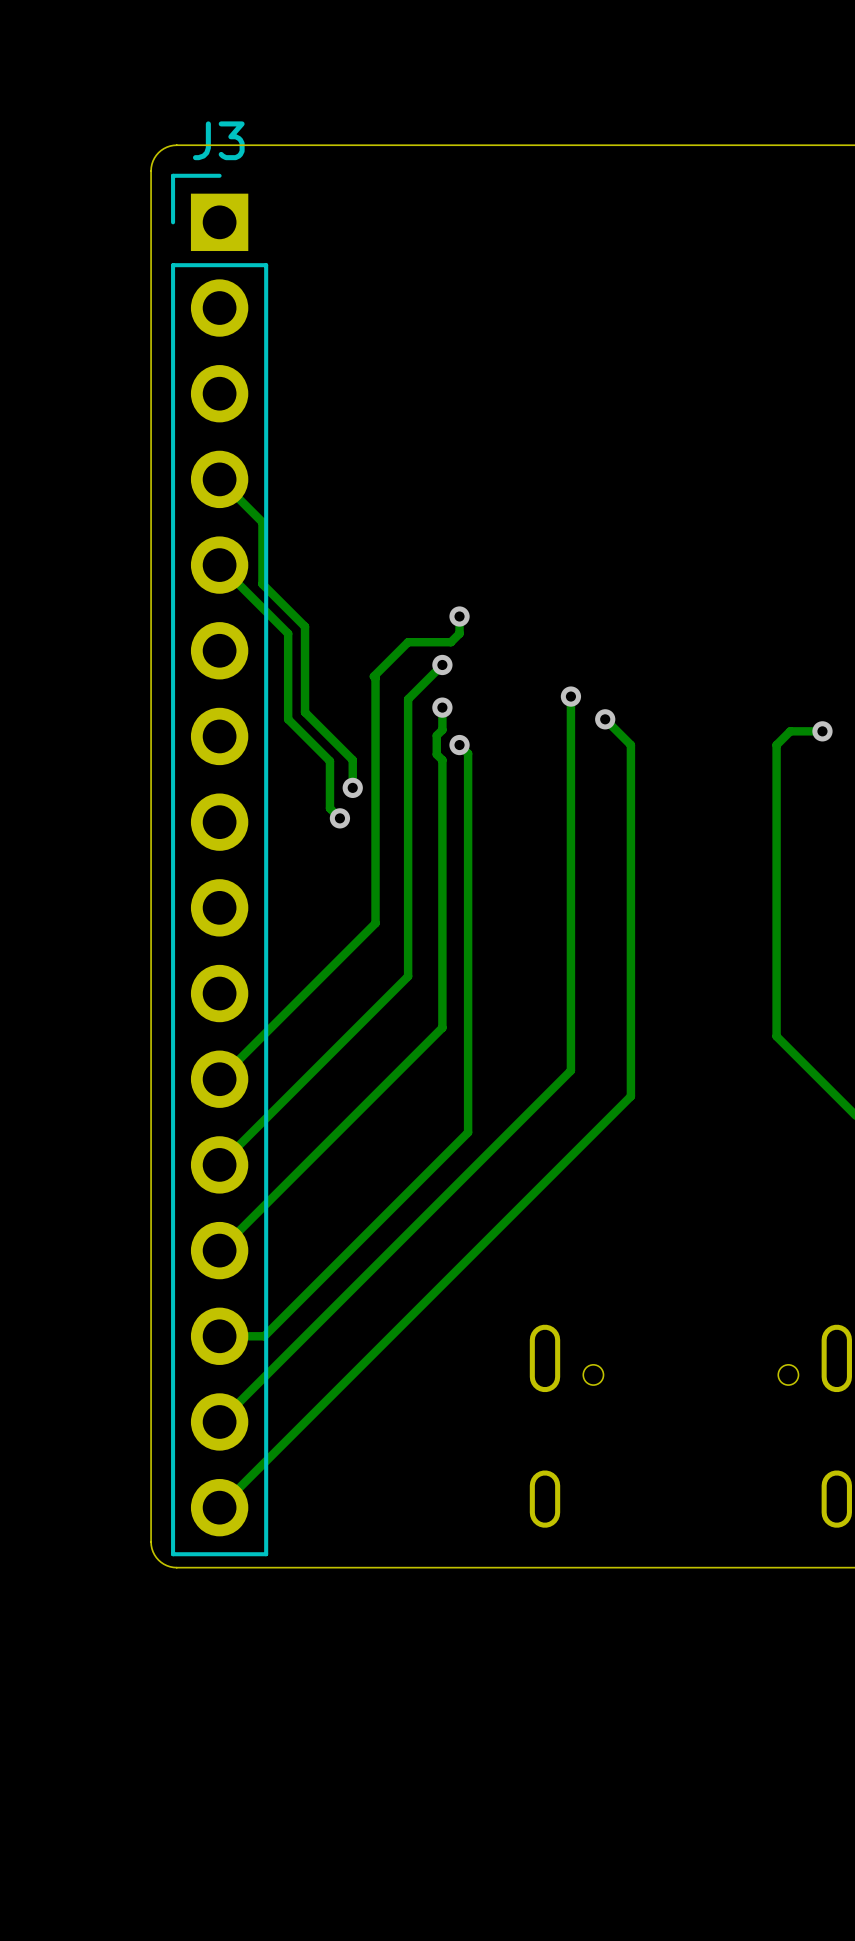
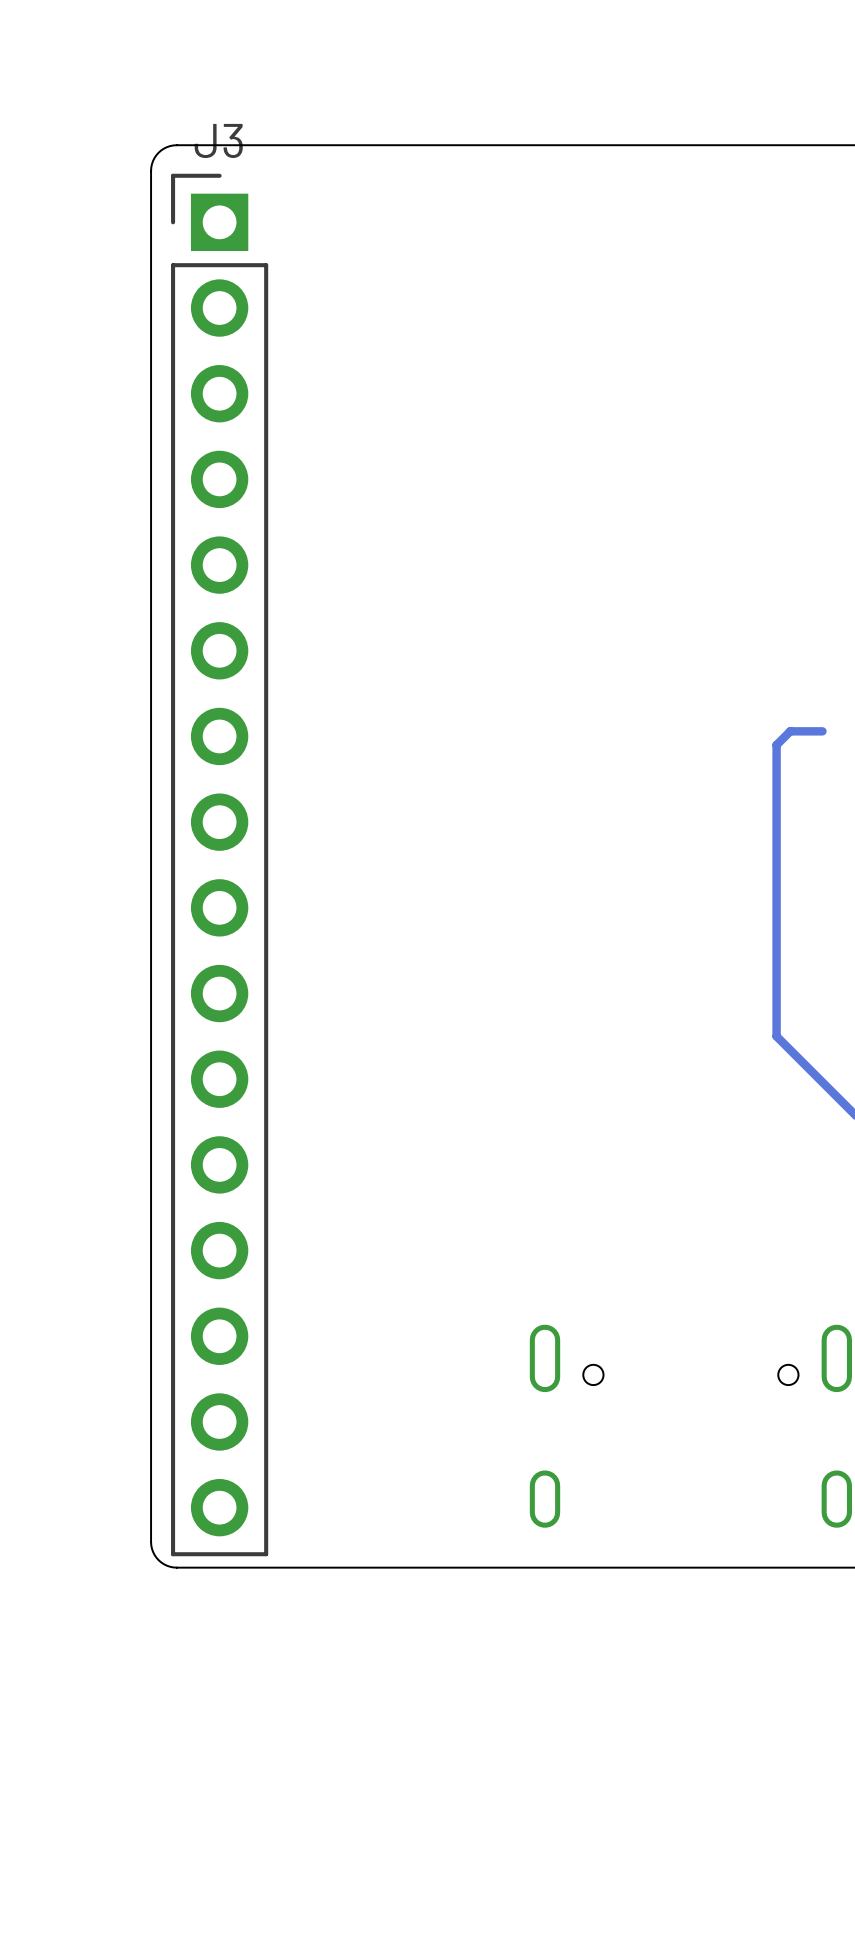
track: (219, 479) (262, 522) (262, 584) (305, 626) (305, 712) (352, 760) (352, 787) -> none
track: (219, 565) (288, 633) (288, 719) (329, 761) (329, 808) (339, 818) -> none
track: (459, 616) (459, 633) (450, 642) (408, 642) (373, 676) (375, 678) (375, 923) (219, 1079) -> none
via: (459, 616) -> none
track: (442, 664) (408, 699) (408, 976) (219, 1164) -> none
via: (442, 664) -> none
track: (570, 696) (570, 1070) (219, 1421) -> none
via: (570, 696) -> none
track: (442, 707) (442, 729) (436, 735) (436, 754) (442, 760) (442, 1027) (219, 1250) -> none
via: (442, 707) -> none
track: (605, 719) (630, 745) (630, 1096) (219, 1507) -> none
via: (605, 719) -> none
via: (822, 731) -> none
track: (459, 745) (468, 753) (468, 1132) (264, 1336) (219, 1336) -> none
via: (459, 745) -> none
via: (352, 787) -> none
via: (339, 818) -> none

